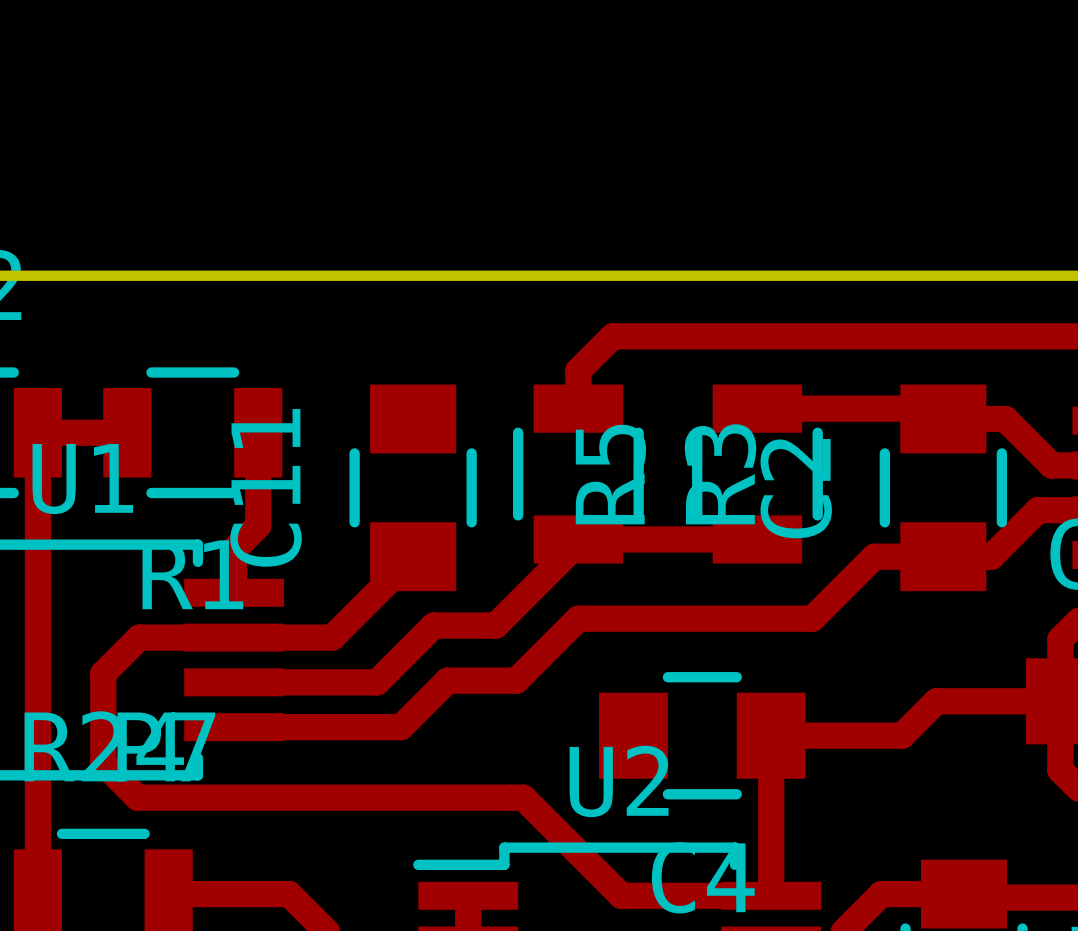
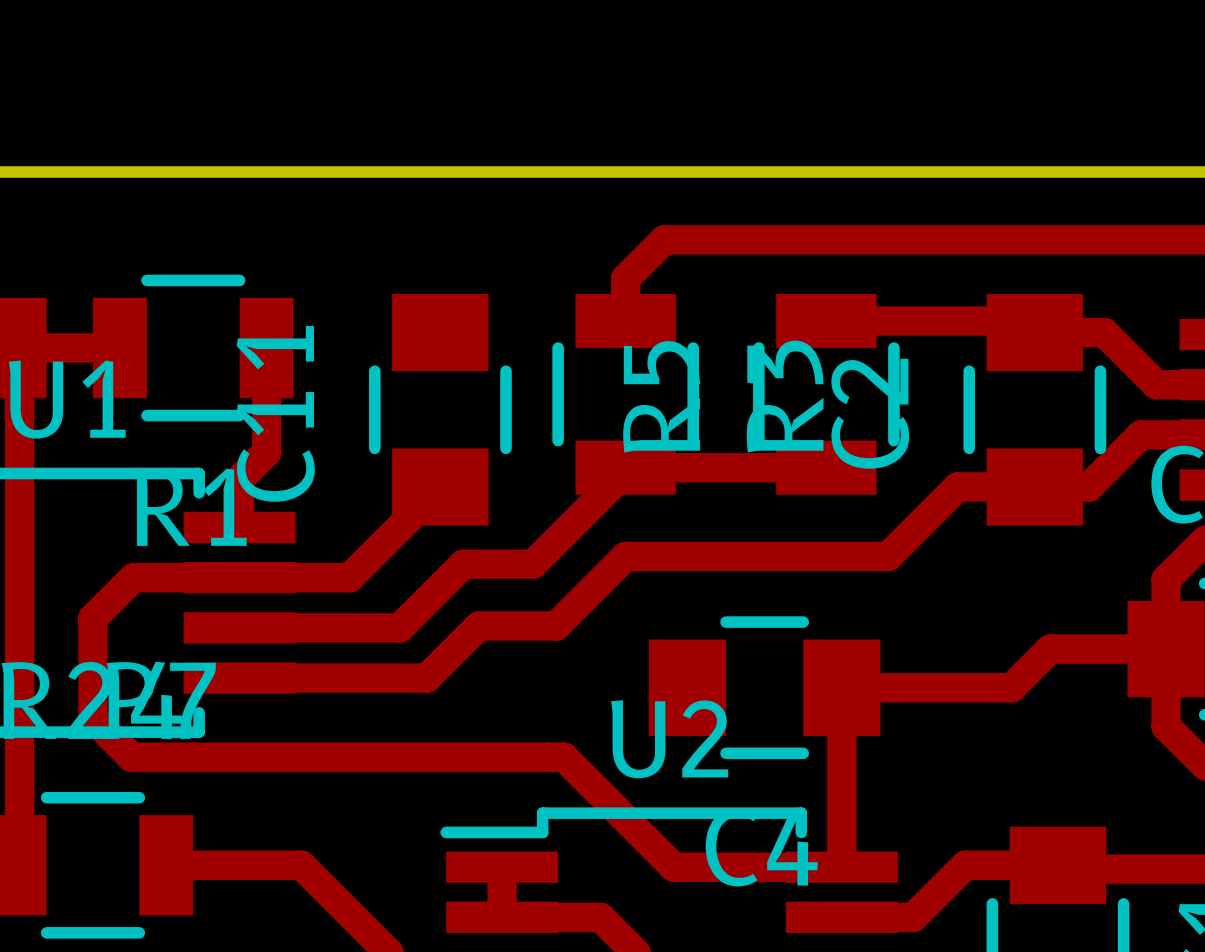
track: (957, 701) (936, 701) (902, 735) -> (1050, 649) (1011, 687) (988, 687)

